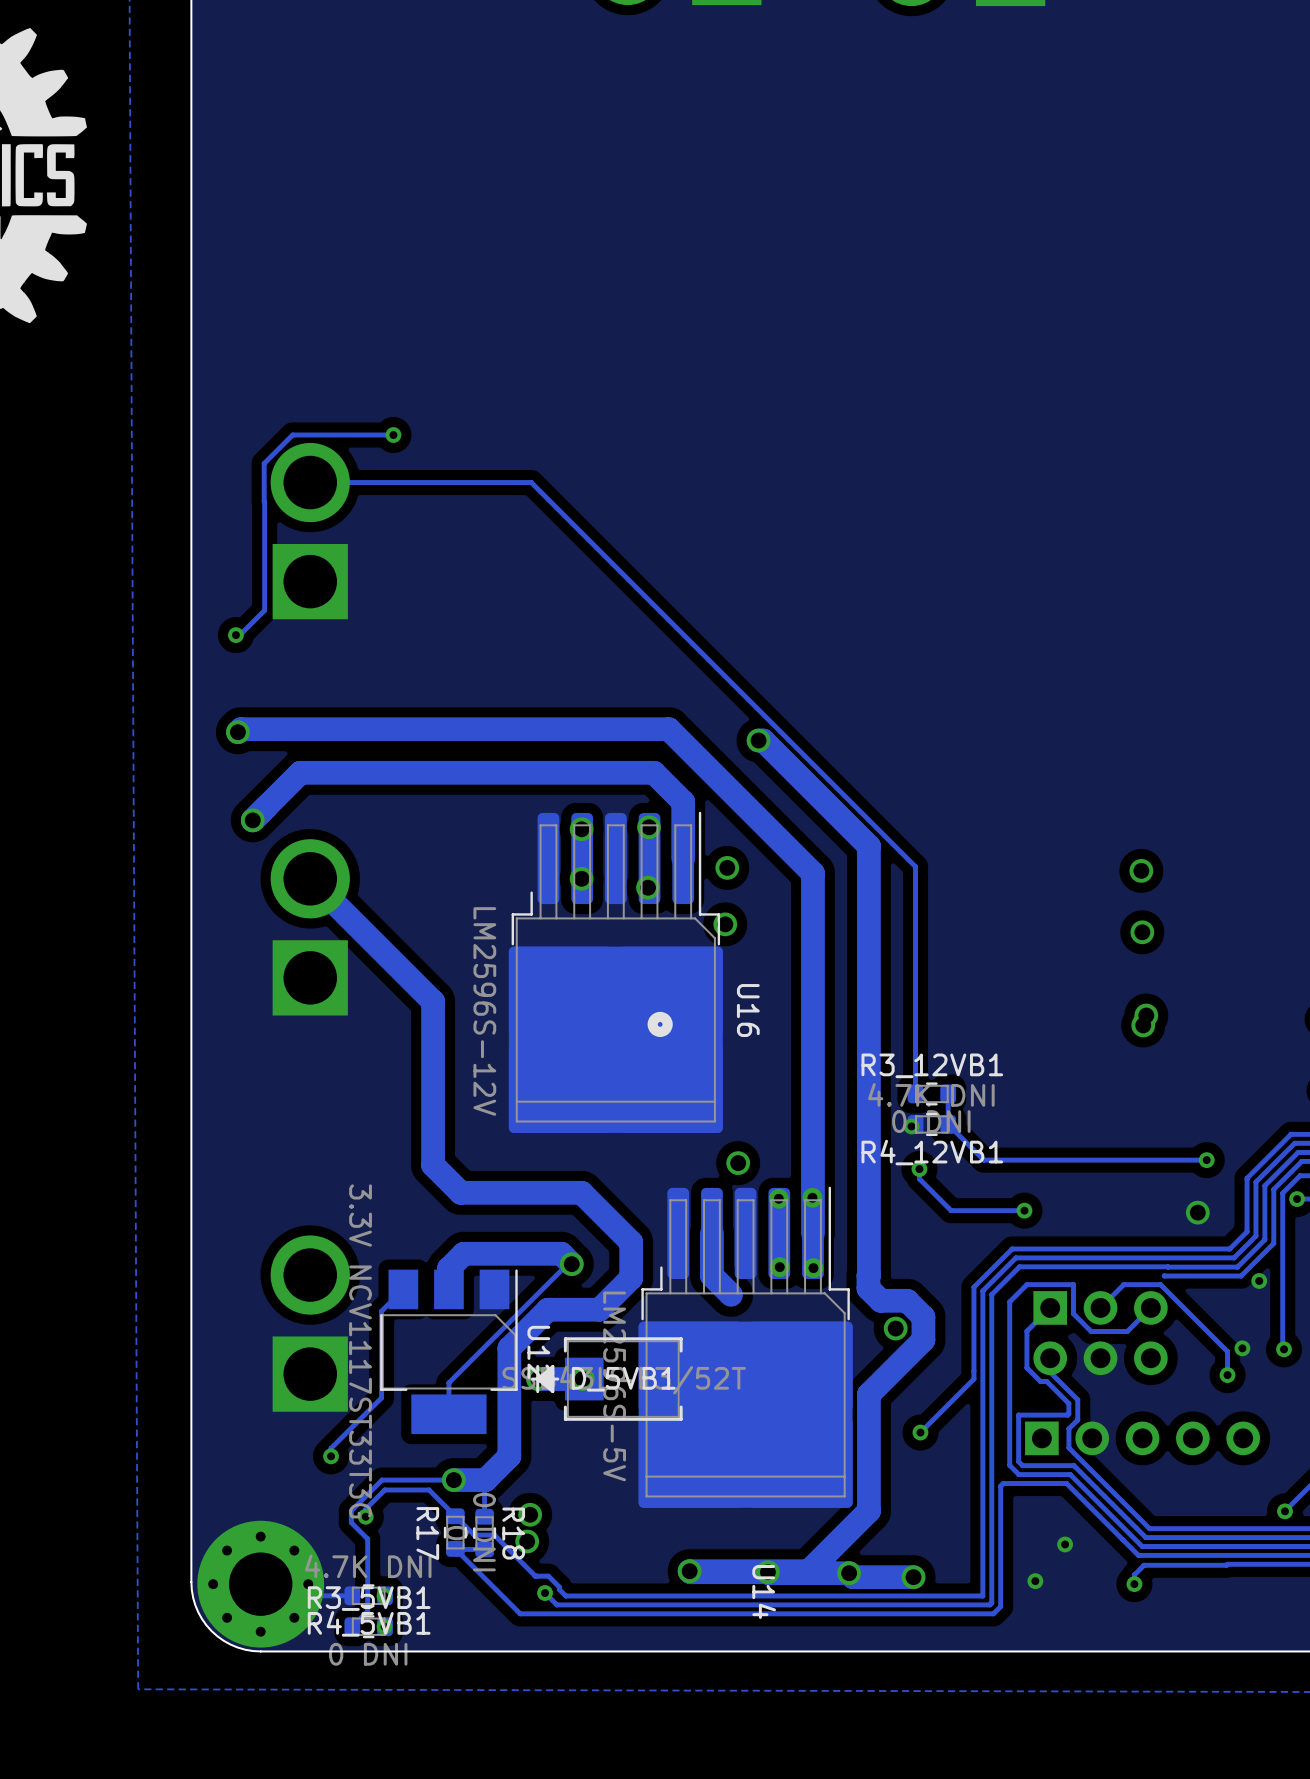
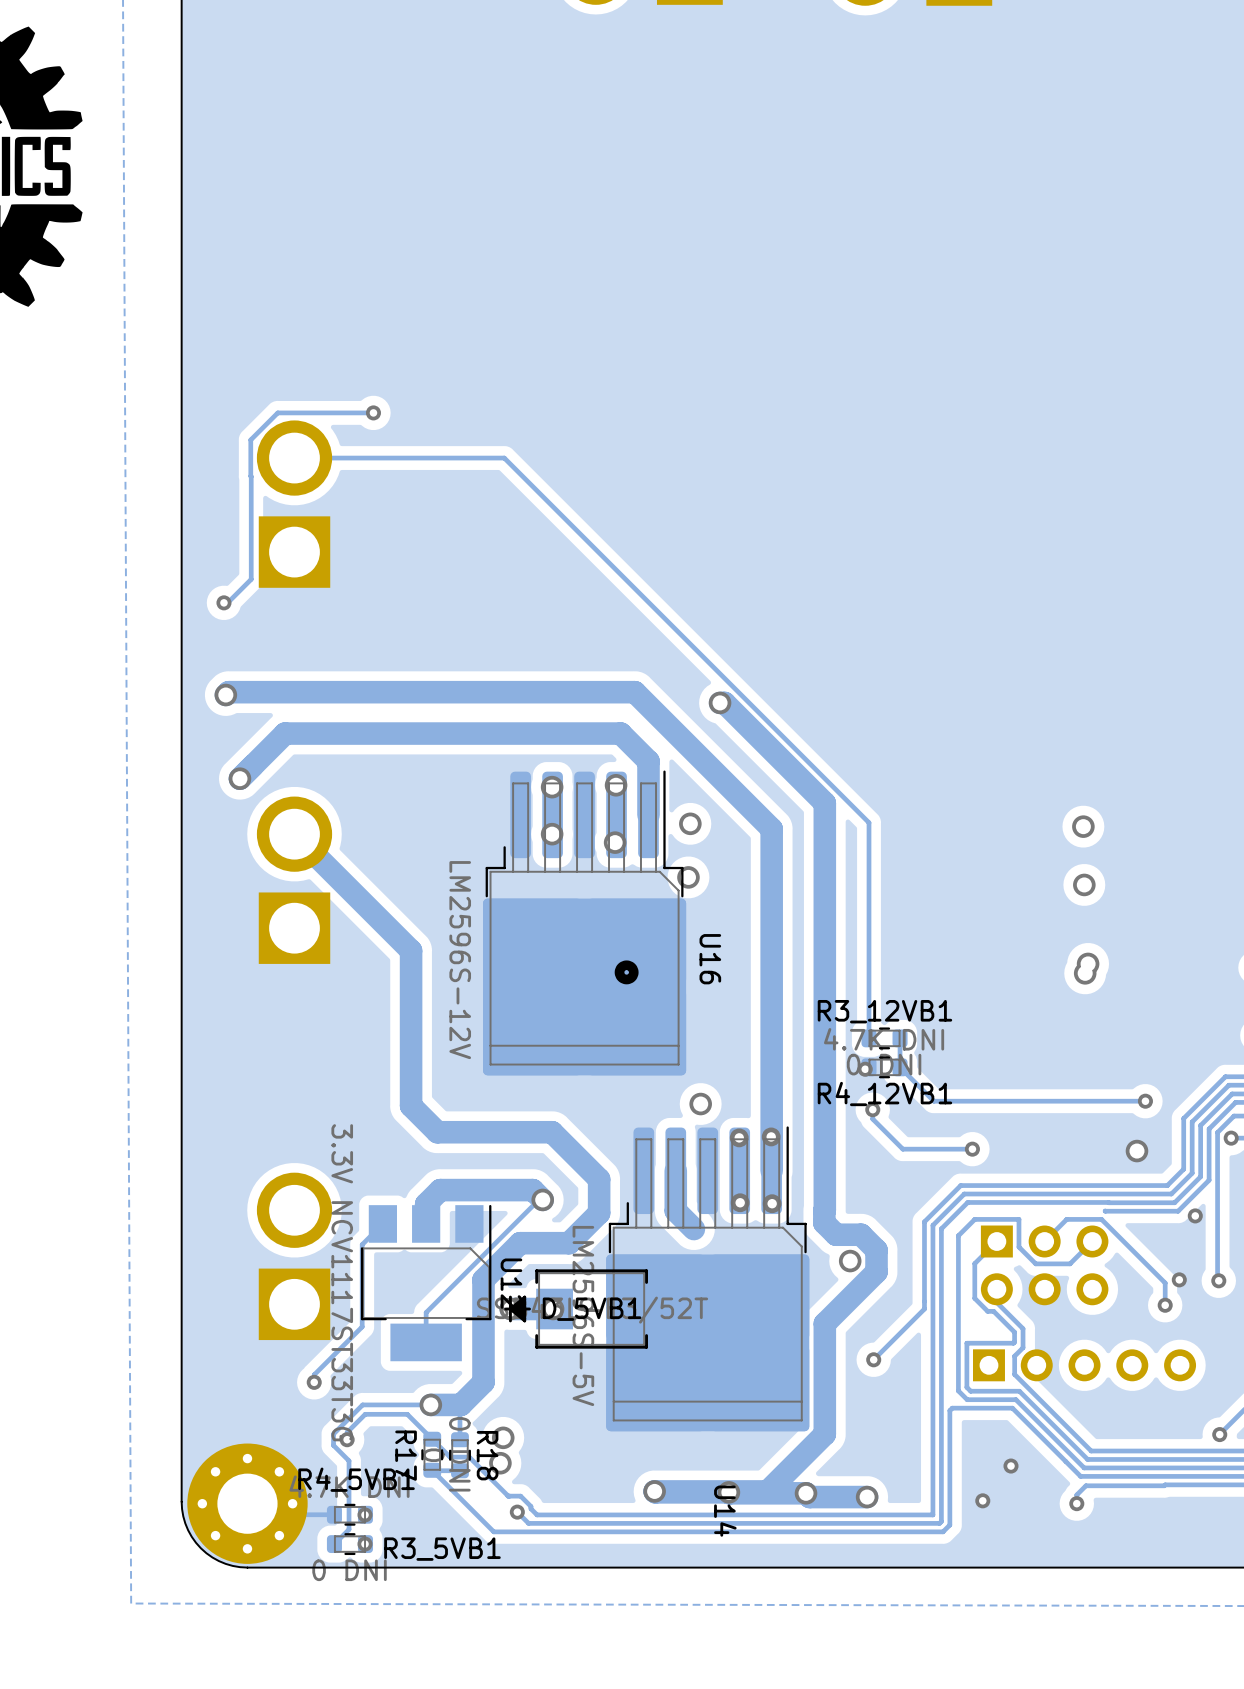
R3_5VB1 name position: R3_5VB1 (369, 1598) -> R3_5VB1 (442, 1549)
R4_5VB1 name position: R4_5VB1 (369, 1623) -> R4_5VB1 (356, 1479)

